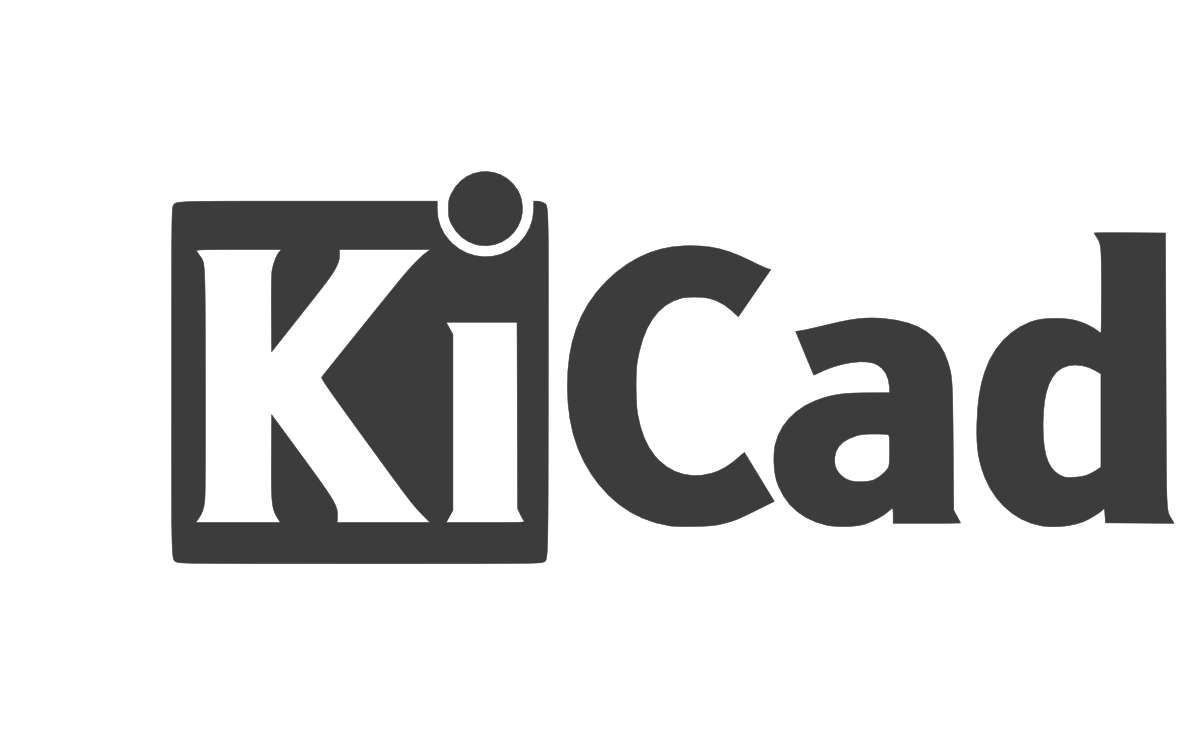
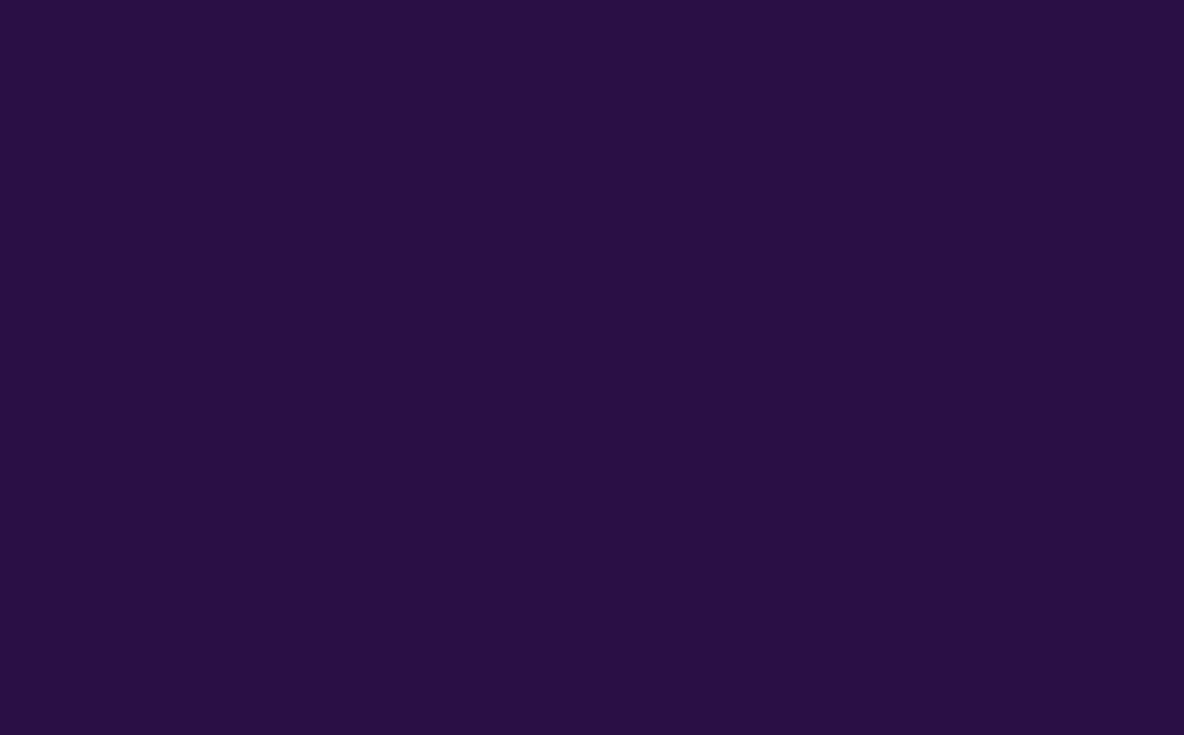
drawing: [171, 171, 1175, 564] -> none

